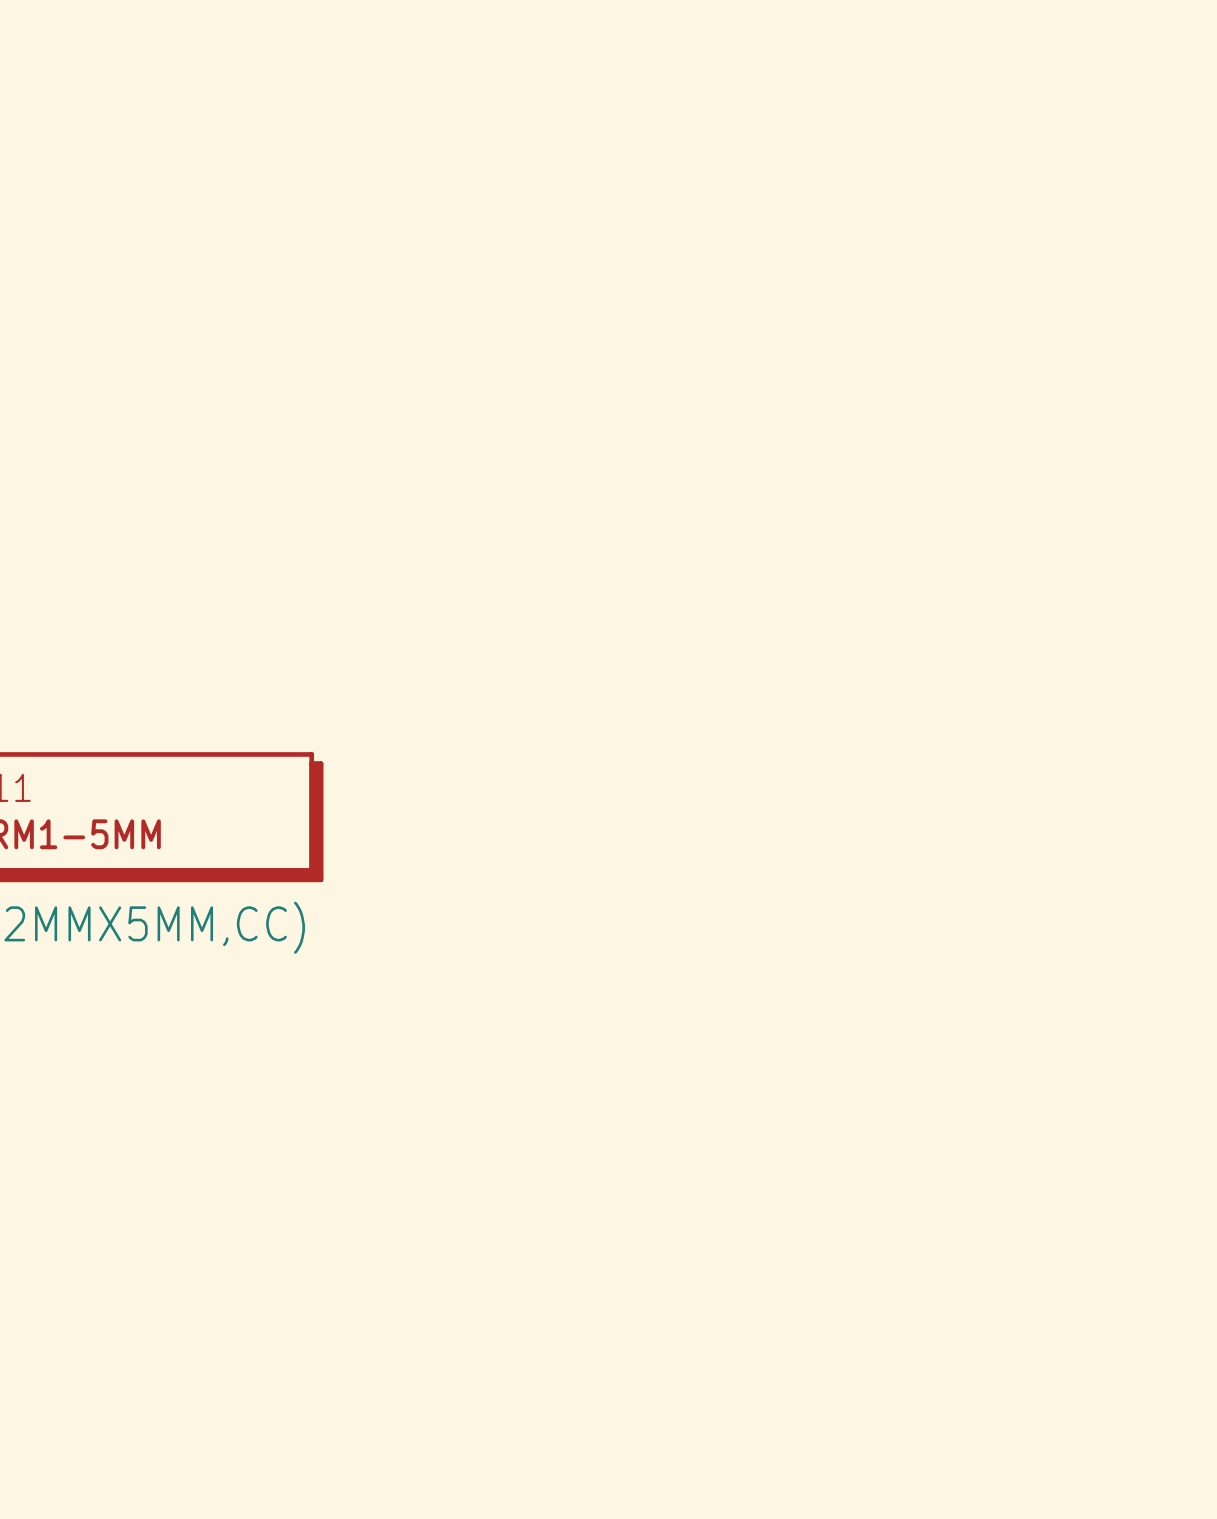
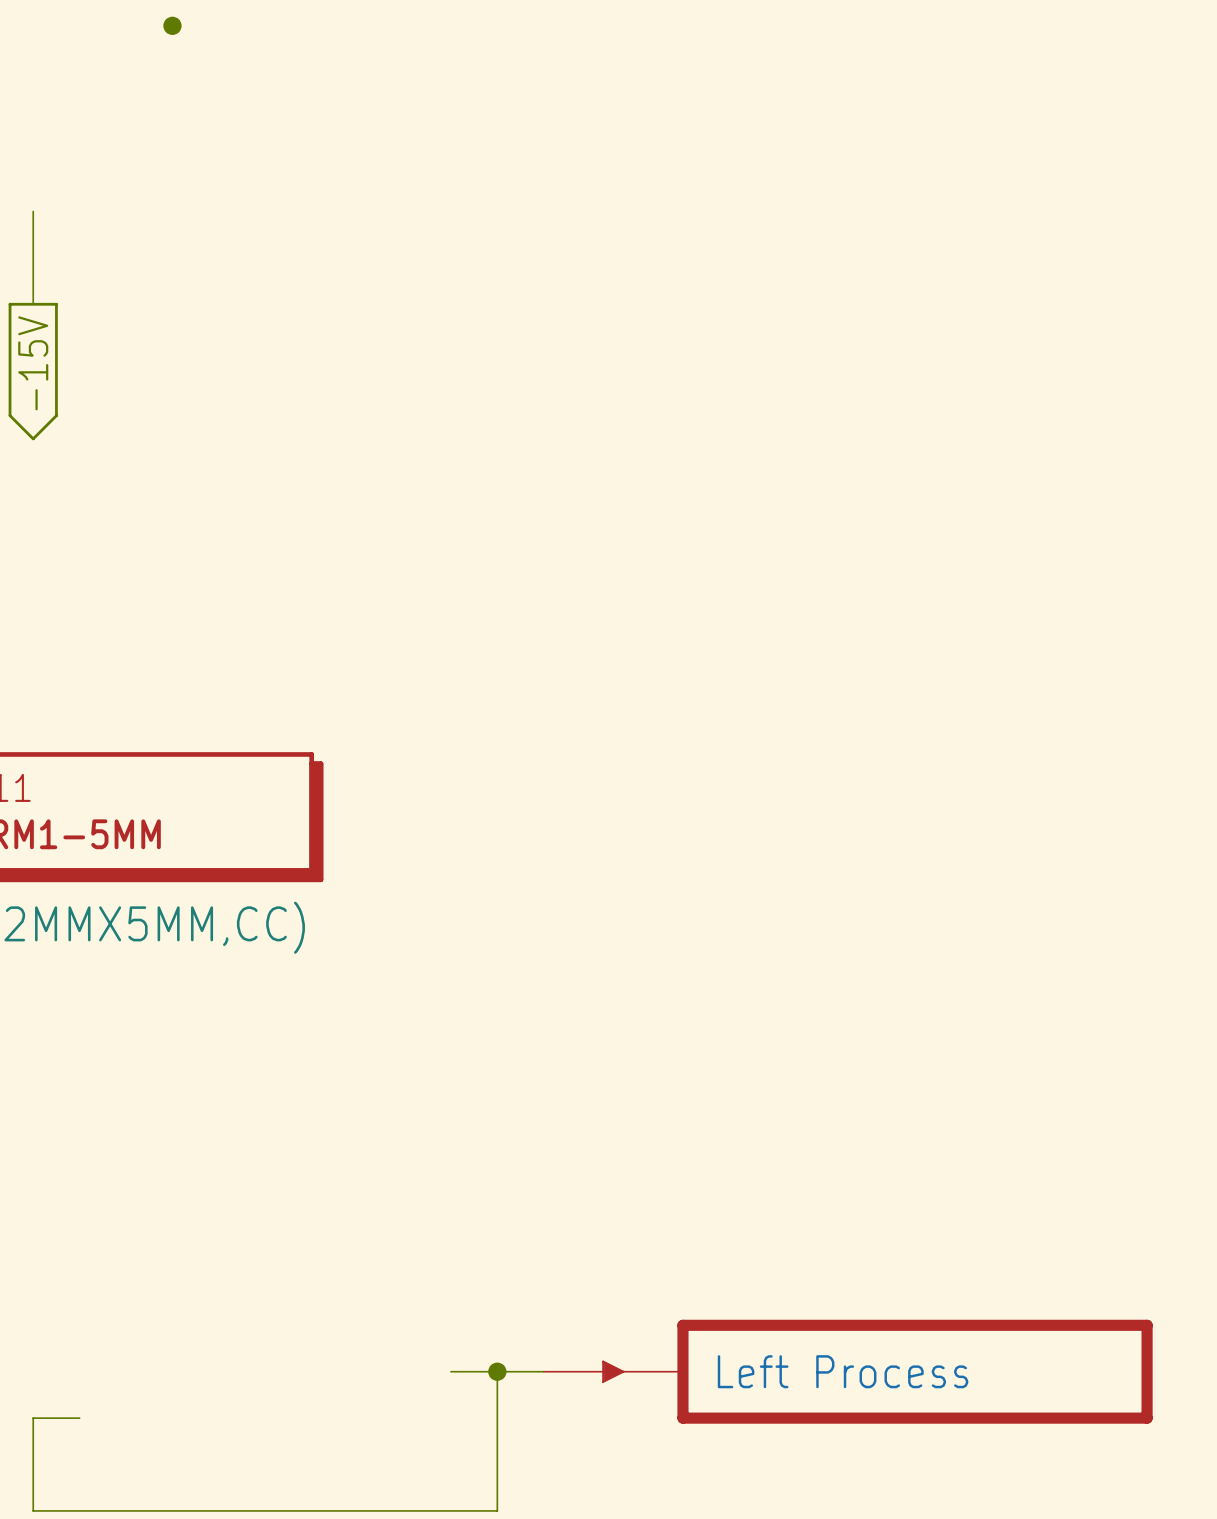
junction: none -> (172, 25)
wire: none -> (33, 211) (33, 304)
power symbol: none -> (33, 371)
wire: none -> (450, 1371) (543, 1371)
wire: none -> (497, 1371) (497, 1510) (33, 1510) (33, 1418) (79, 1418)
junction: none -> (497, 1371)
part: none -> (848, 1371)

